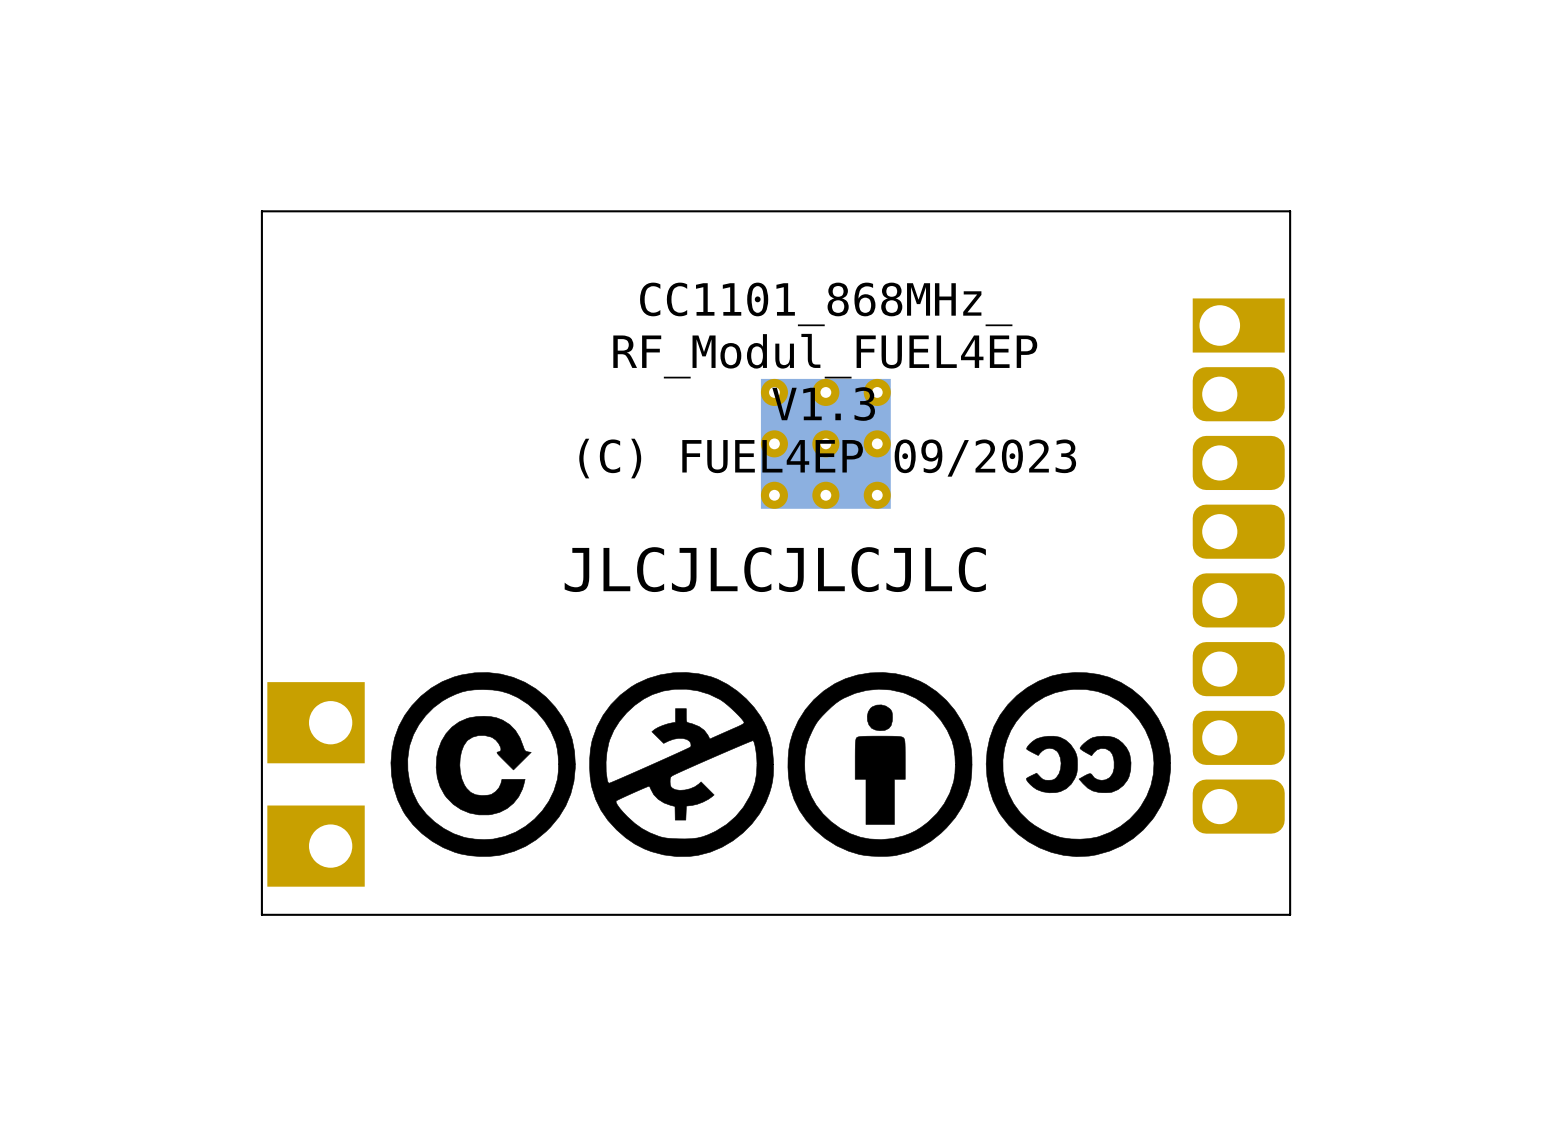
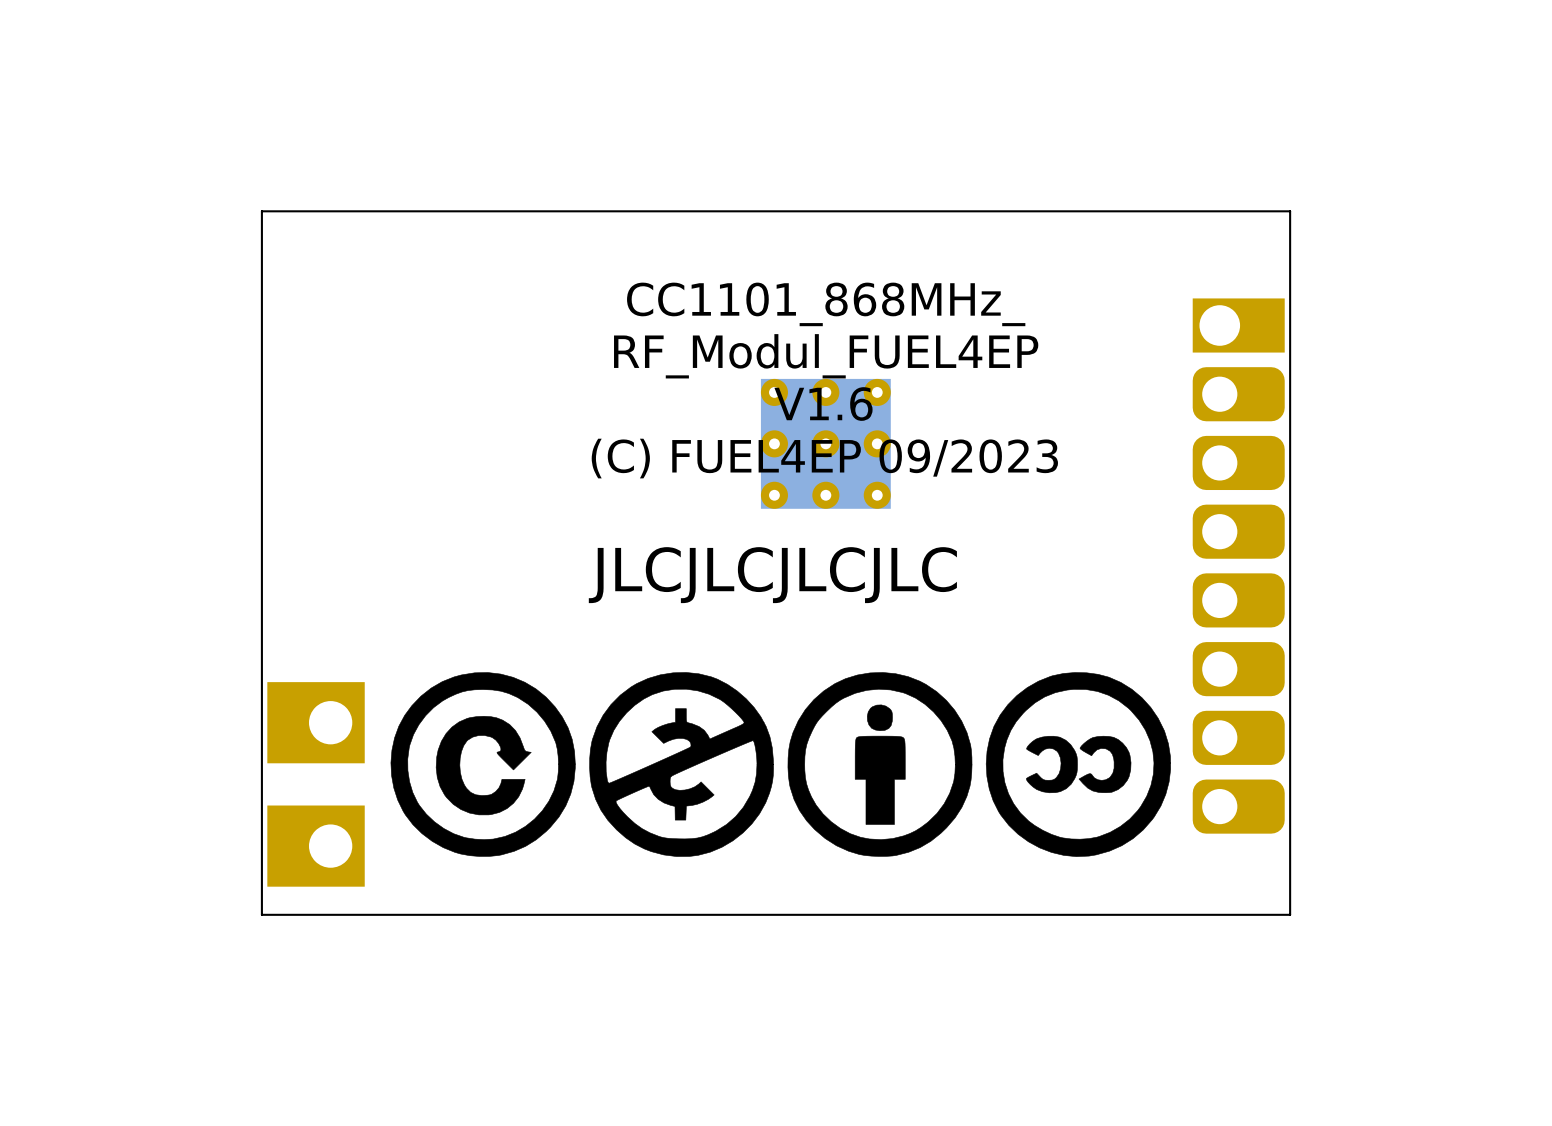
text: V1.3 (823, 404) -> V1.6 (823, 404)

